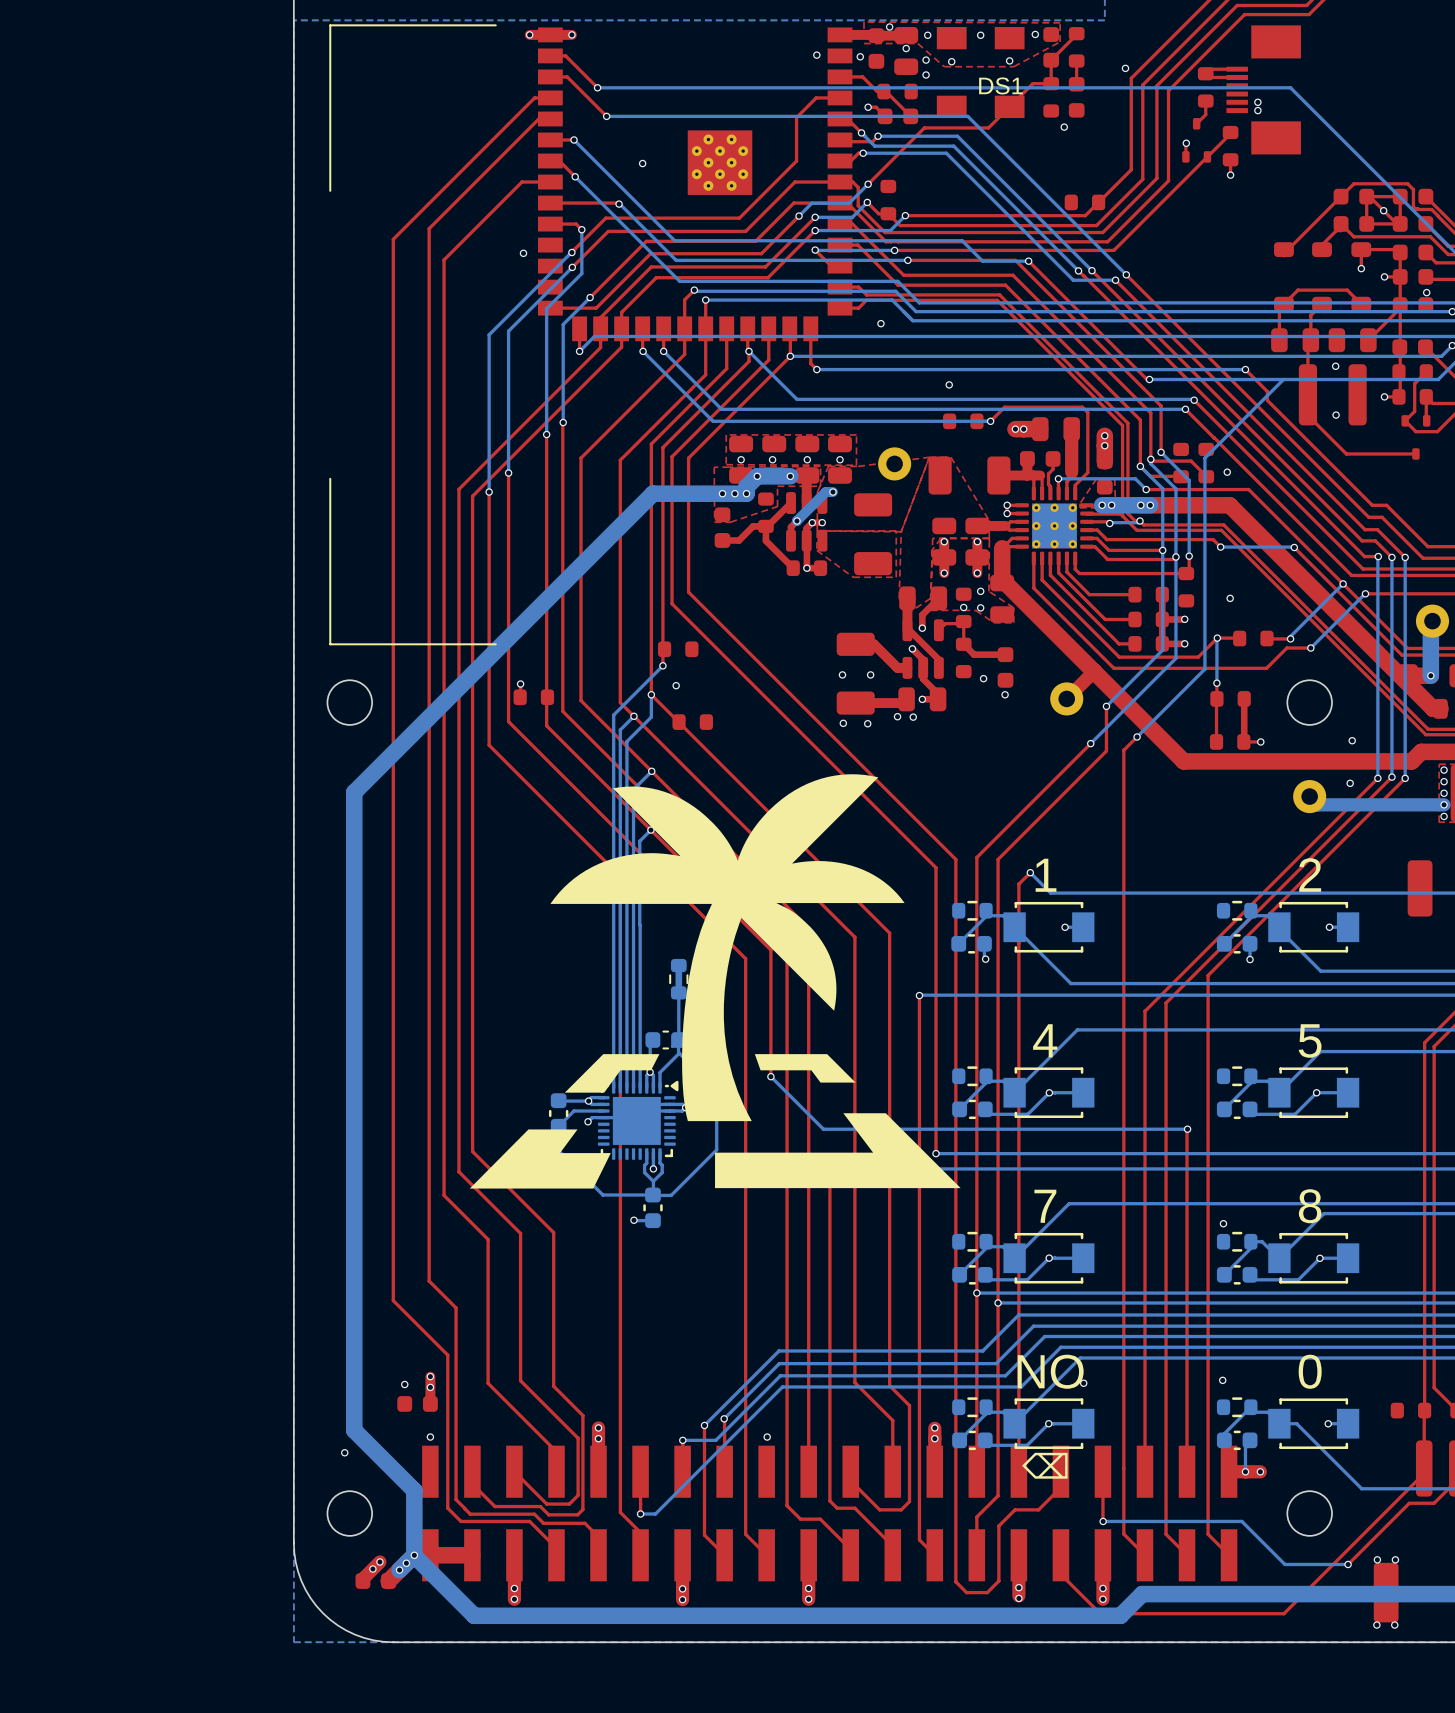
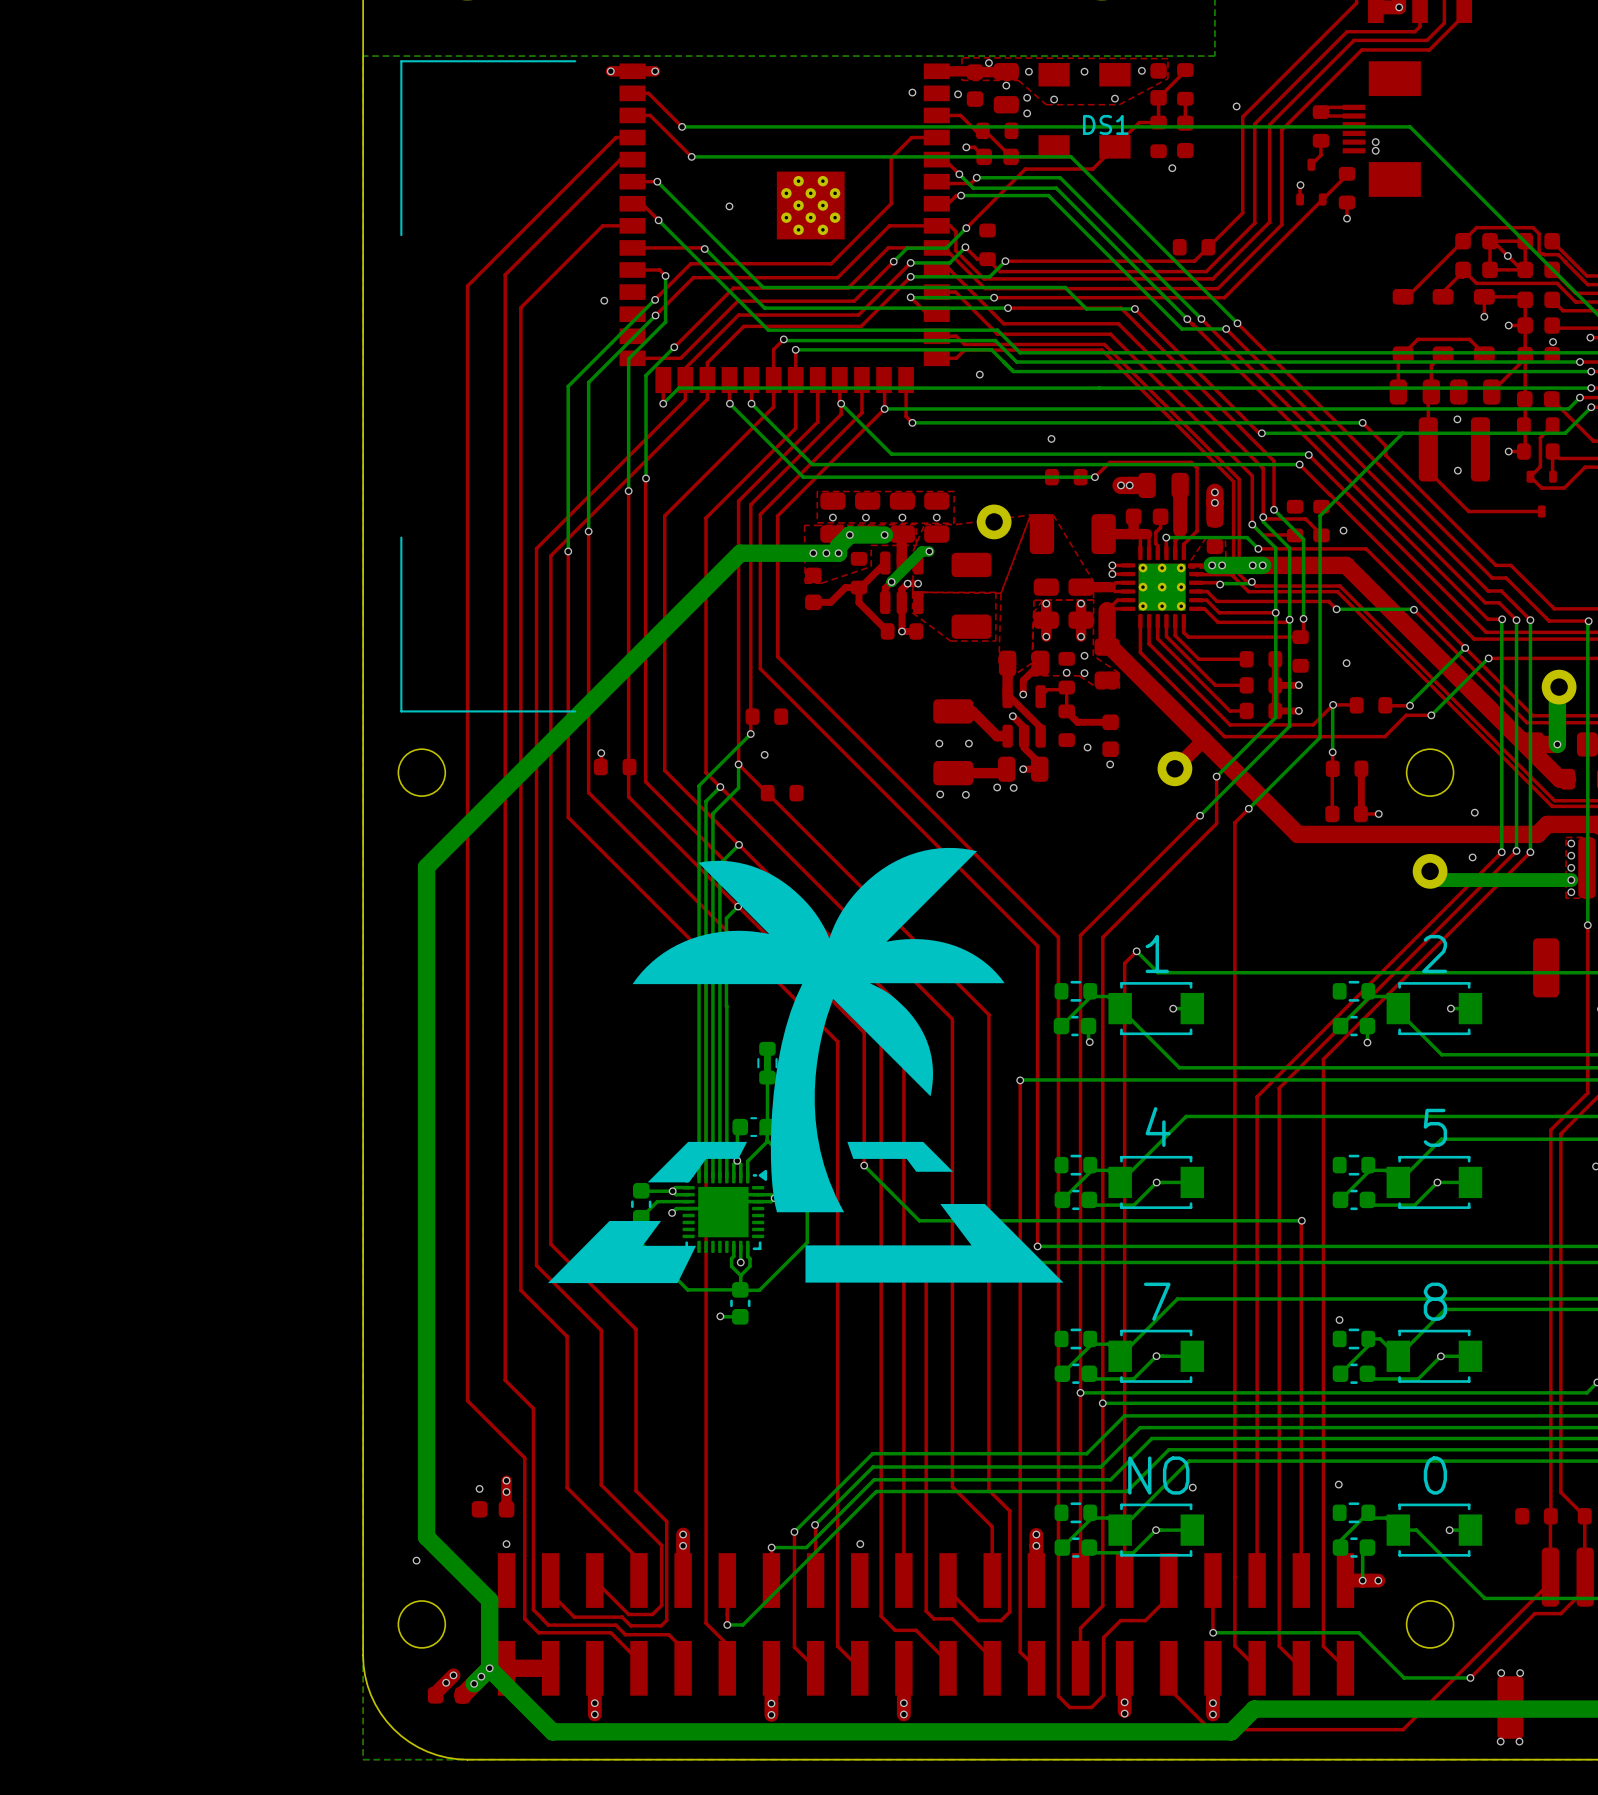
text: ⌫ (1044, 1465) -> none

